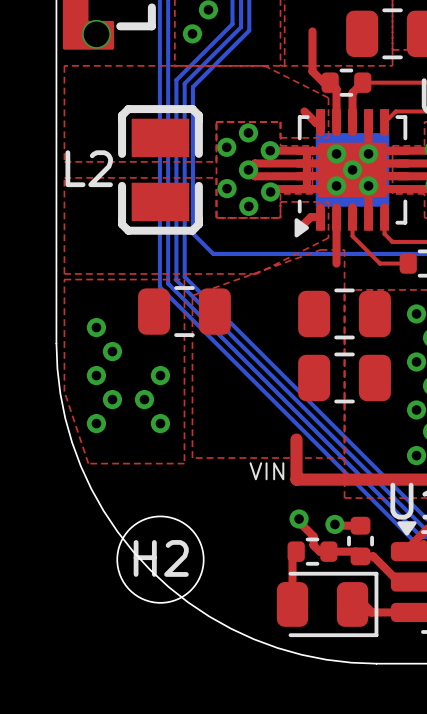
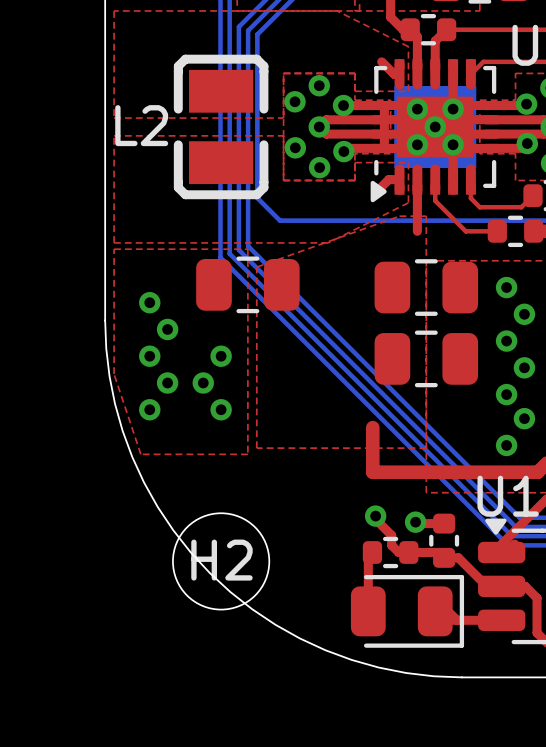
text: VIN (266, 471) -> none

